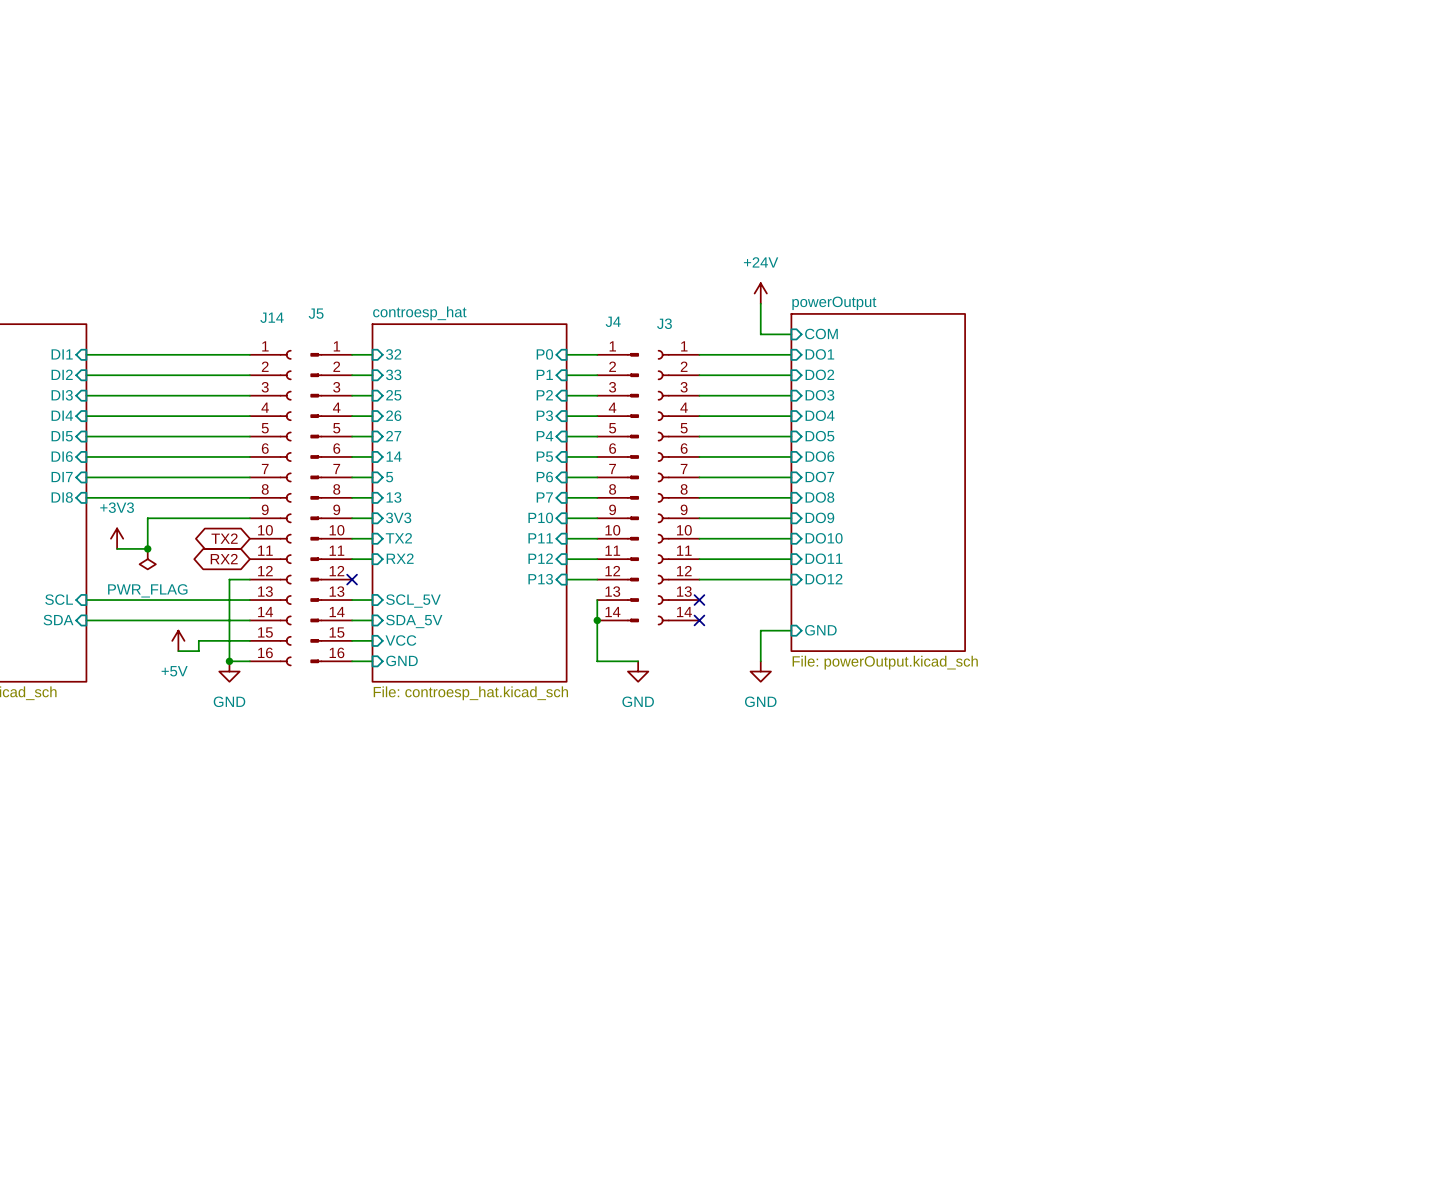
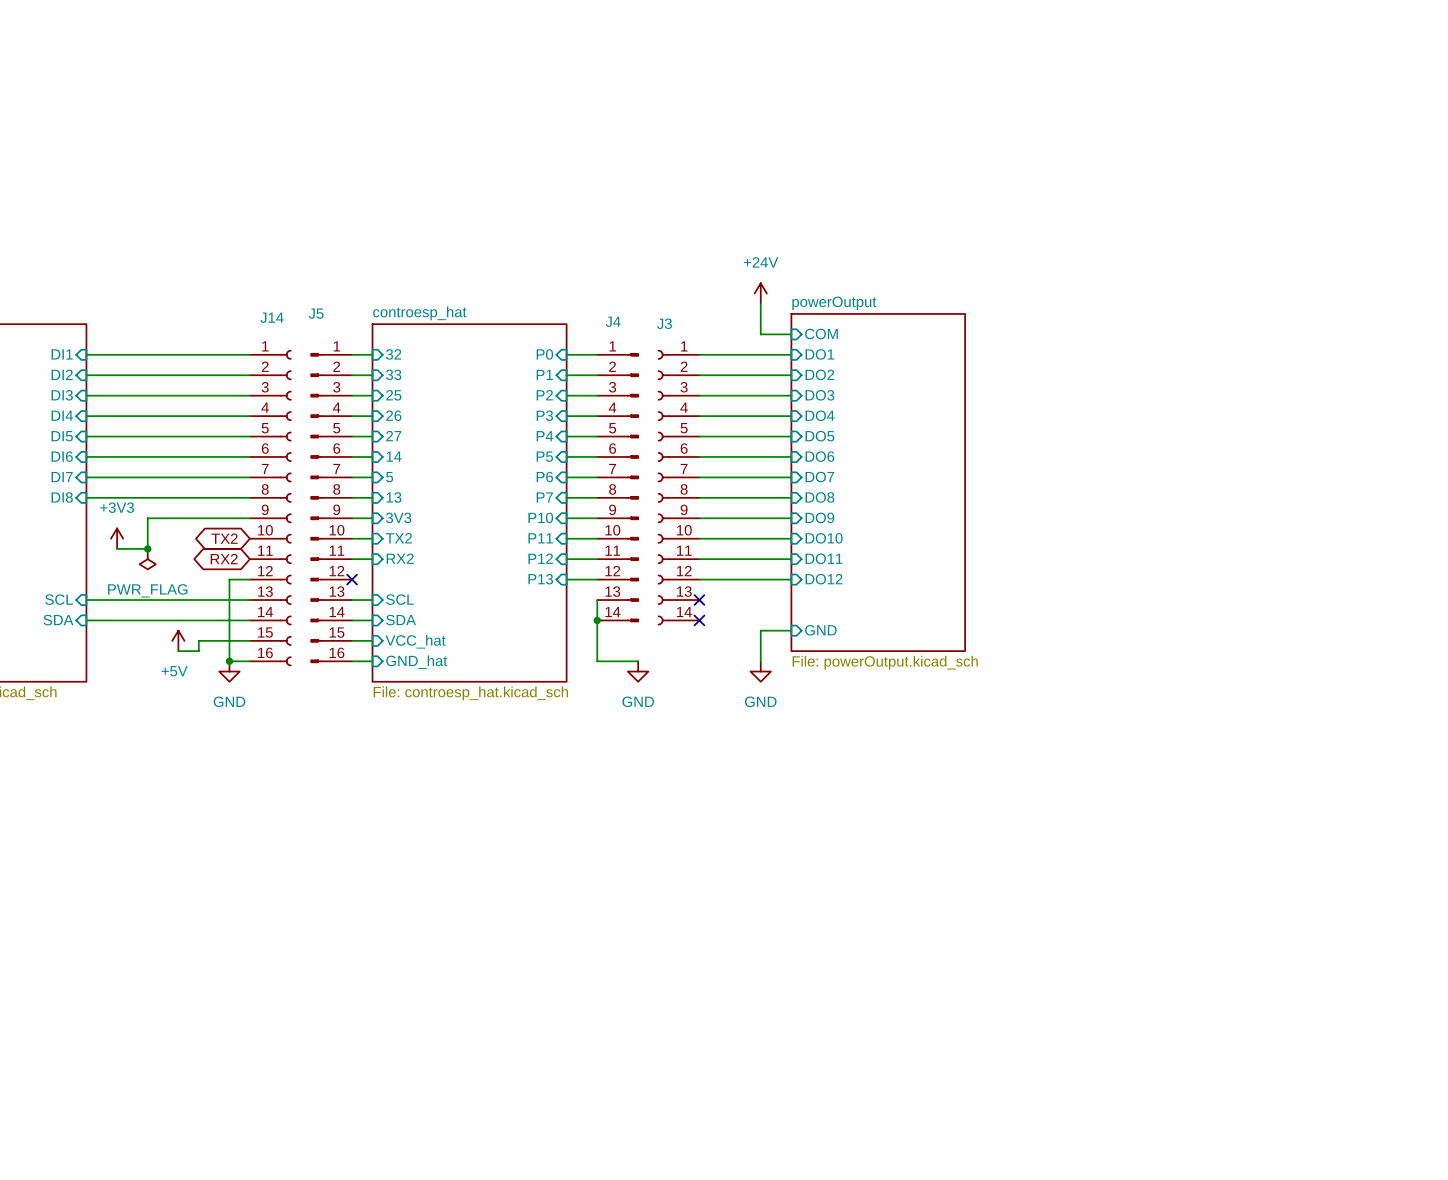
sheet pin: SCL_5V (413, 601) -> SCL (400, 599)
sheet pin: SDA_5V (414, 621) -> SDA (401, 620)
sheet pin: VCC (400, 640) -> VCC_hat (415, 641)
sheet pin: GND (402, 660) -> GND_hat (416, 662)

